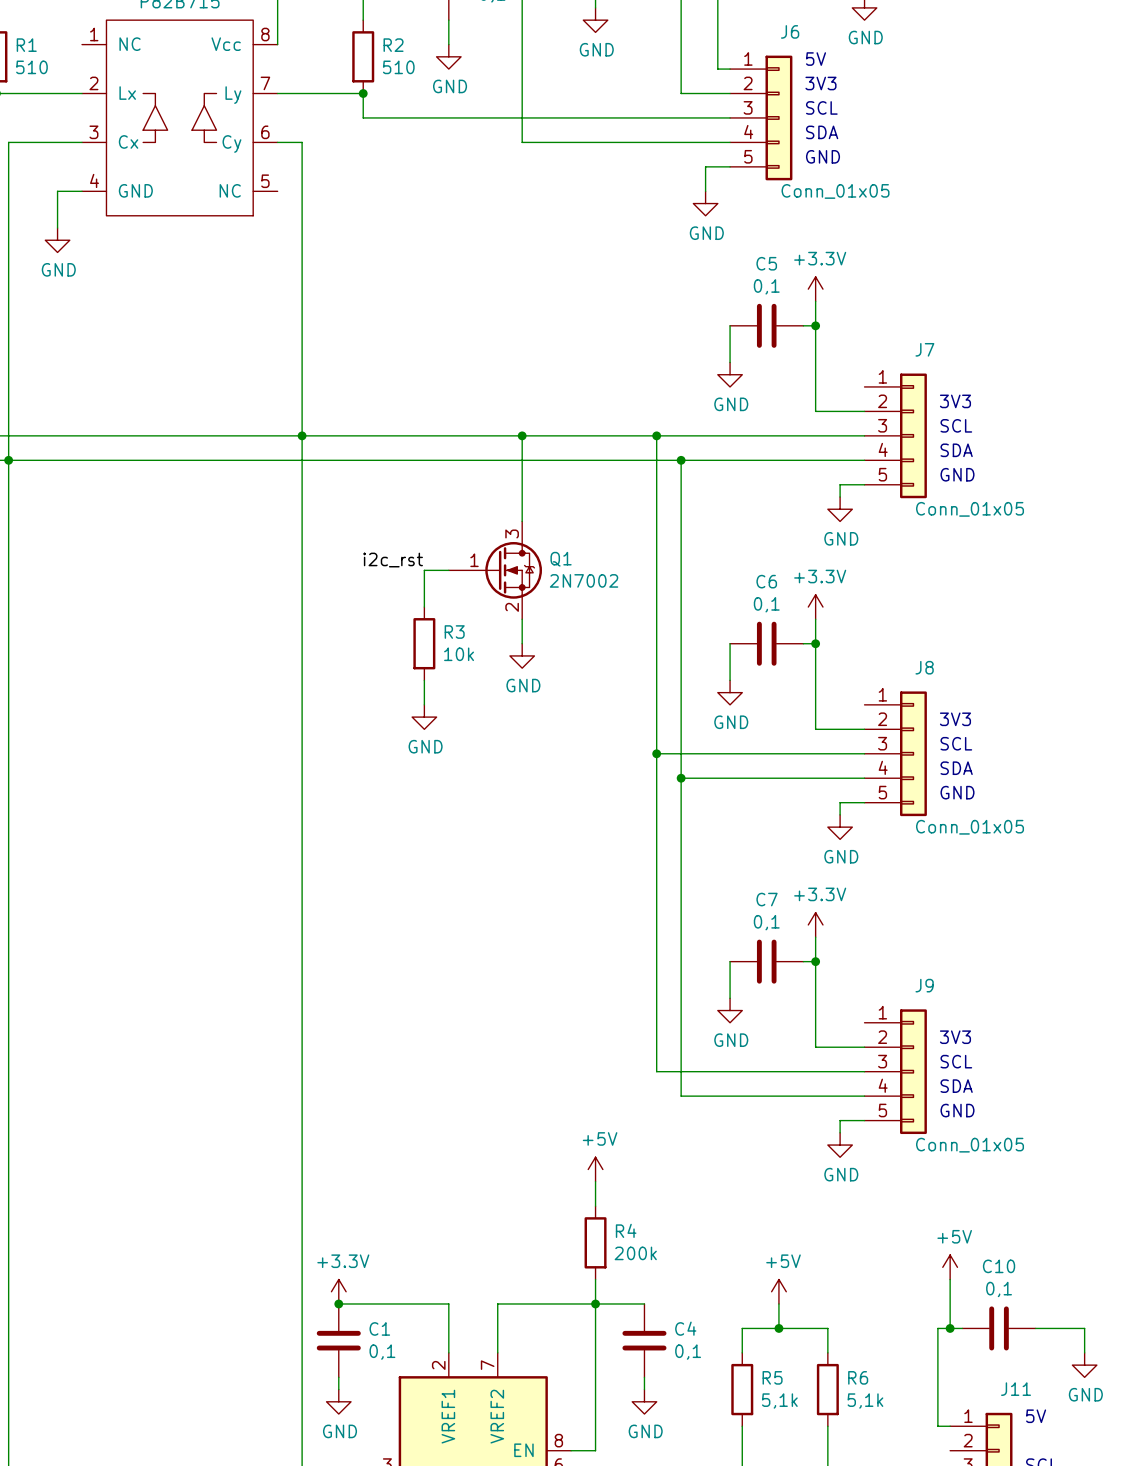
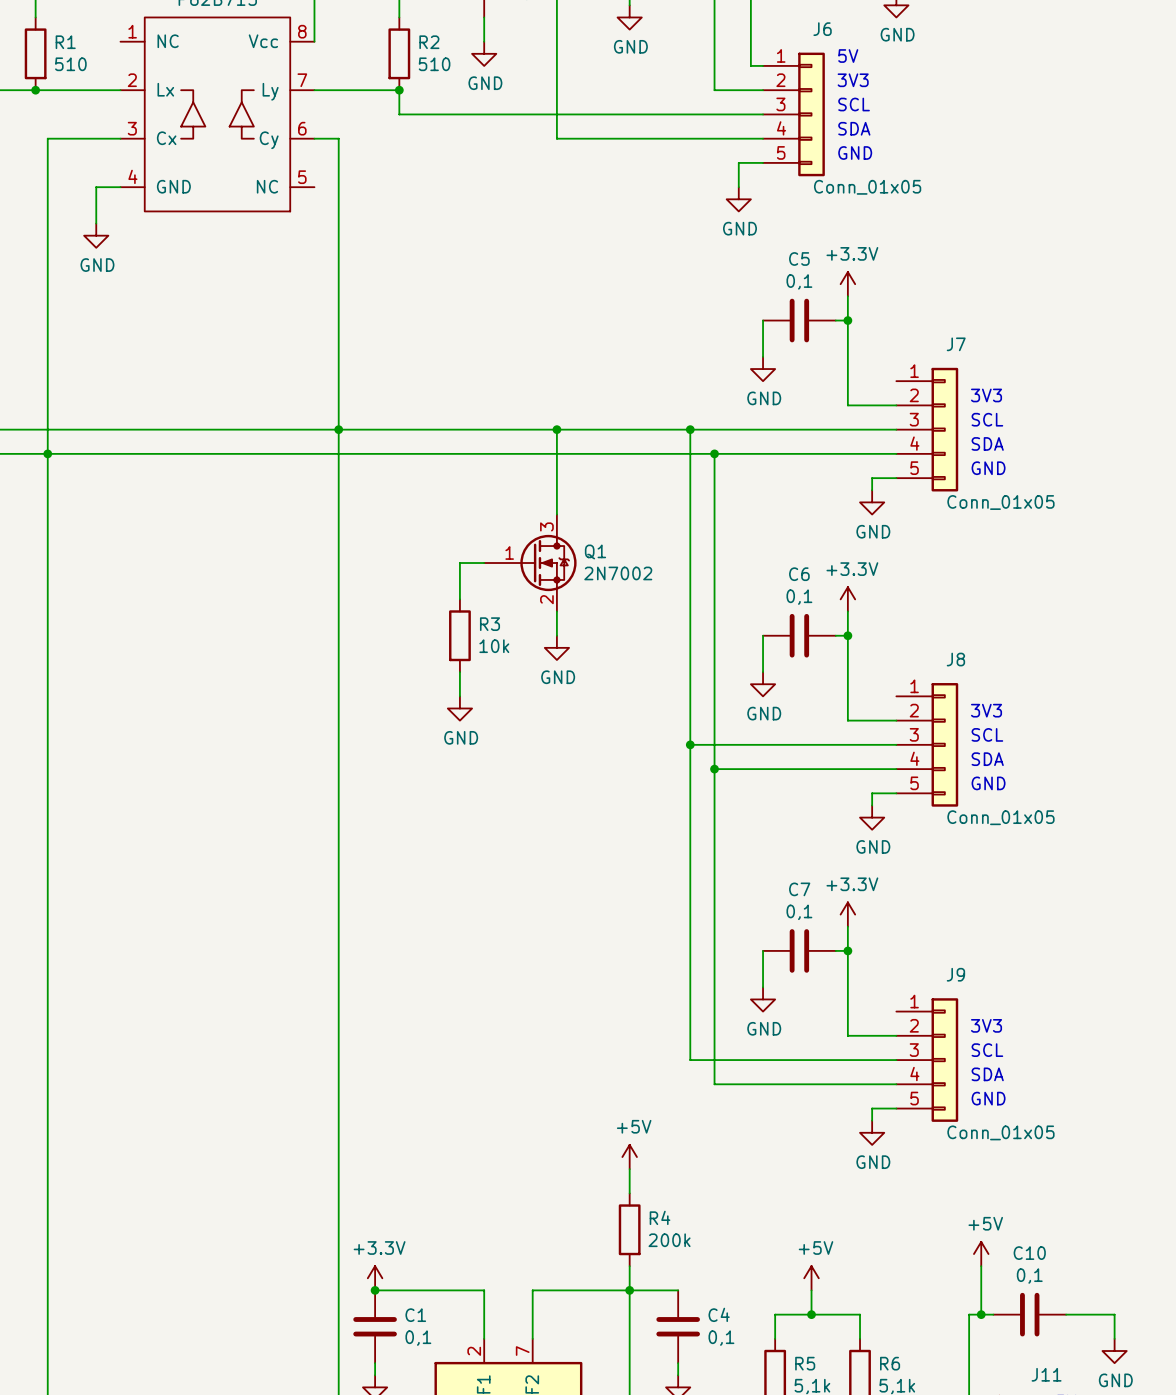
label: i2c_rst (393, 560) -> none

